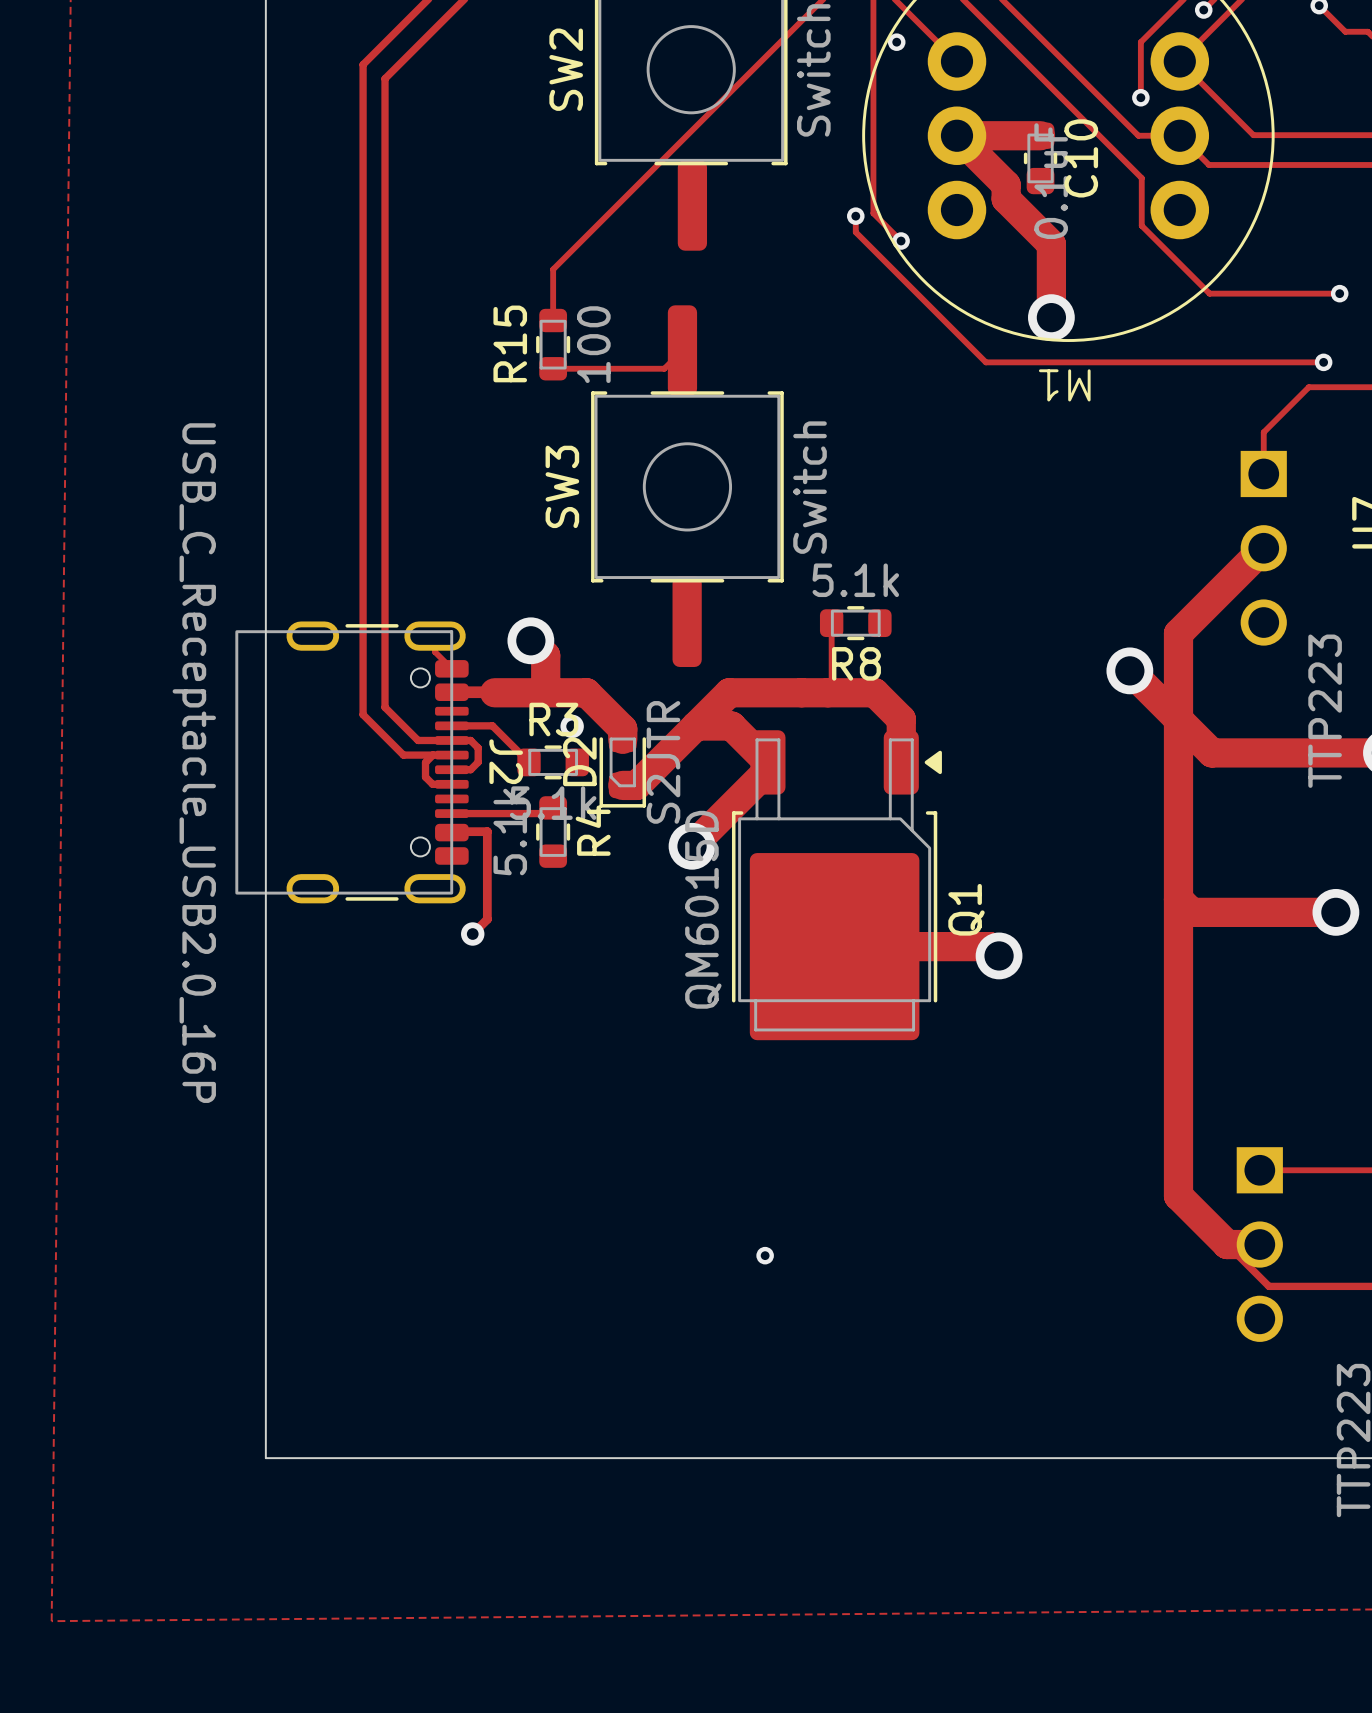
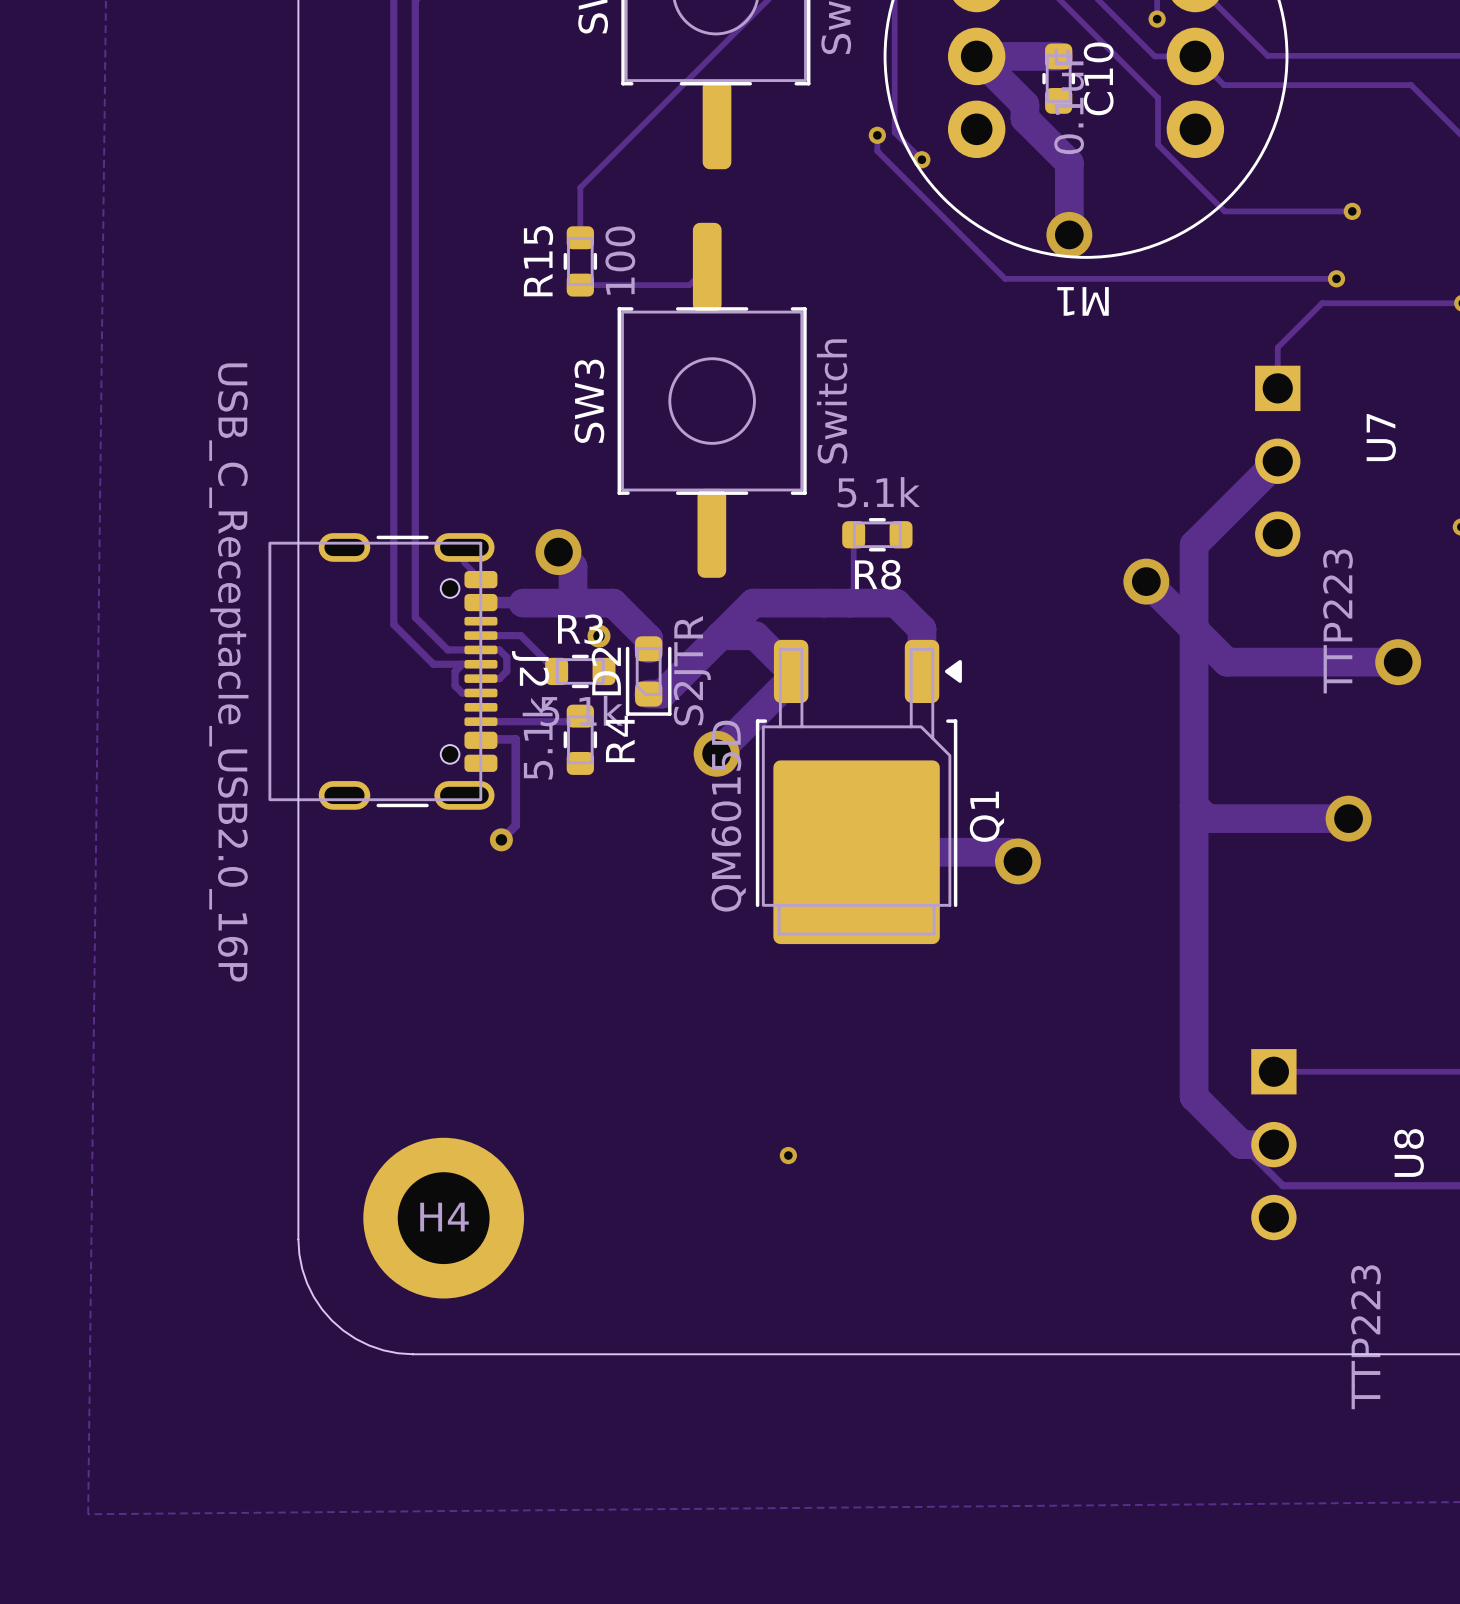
H4: none -> (443, 1218)
board edge: (265, 1341) (265, 1458) (382, 1458) -> (298, 1239) (302, 1269) (307, 1283) (313, 1296) (332, 1320) (355, 1338) (369, 1345) (398, 1353) (413, 1354)

